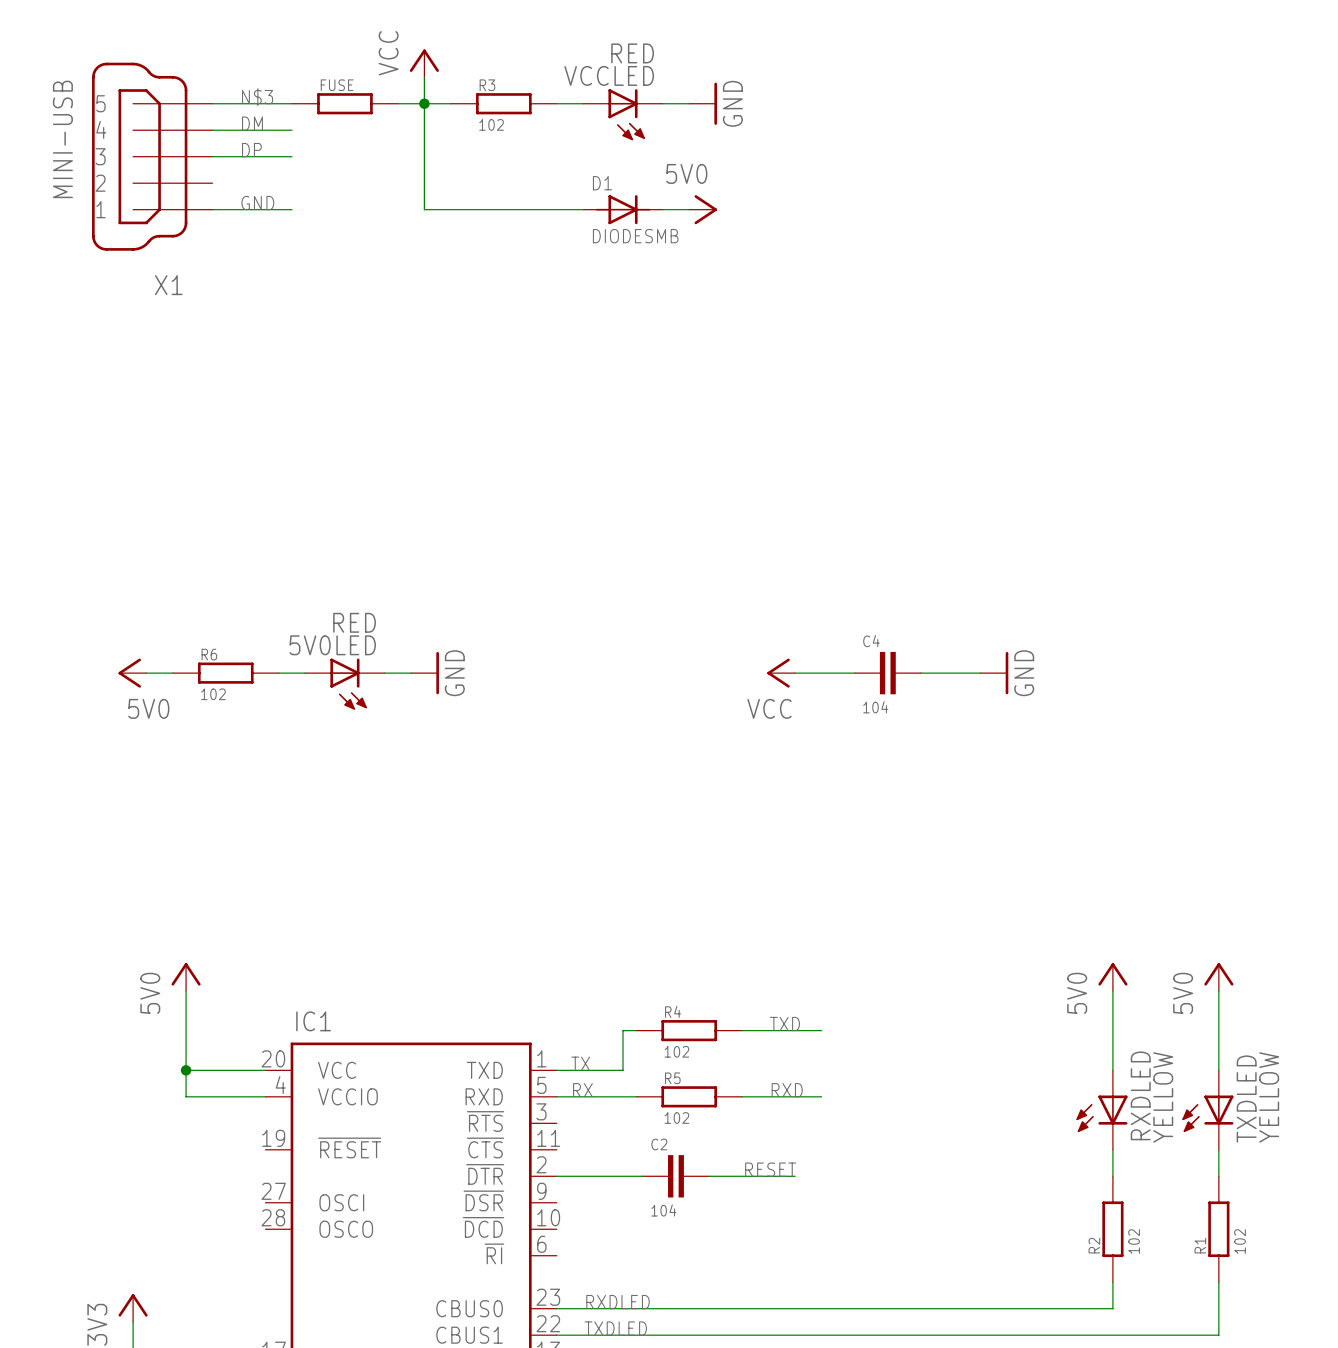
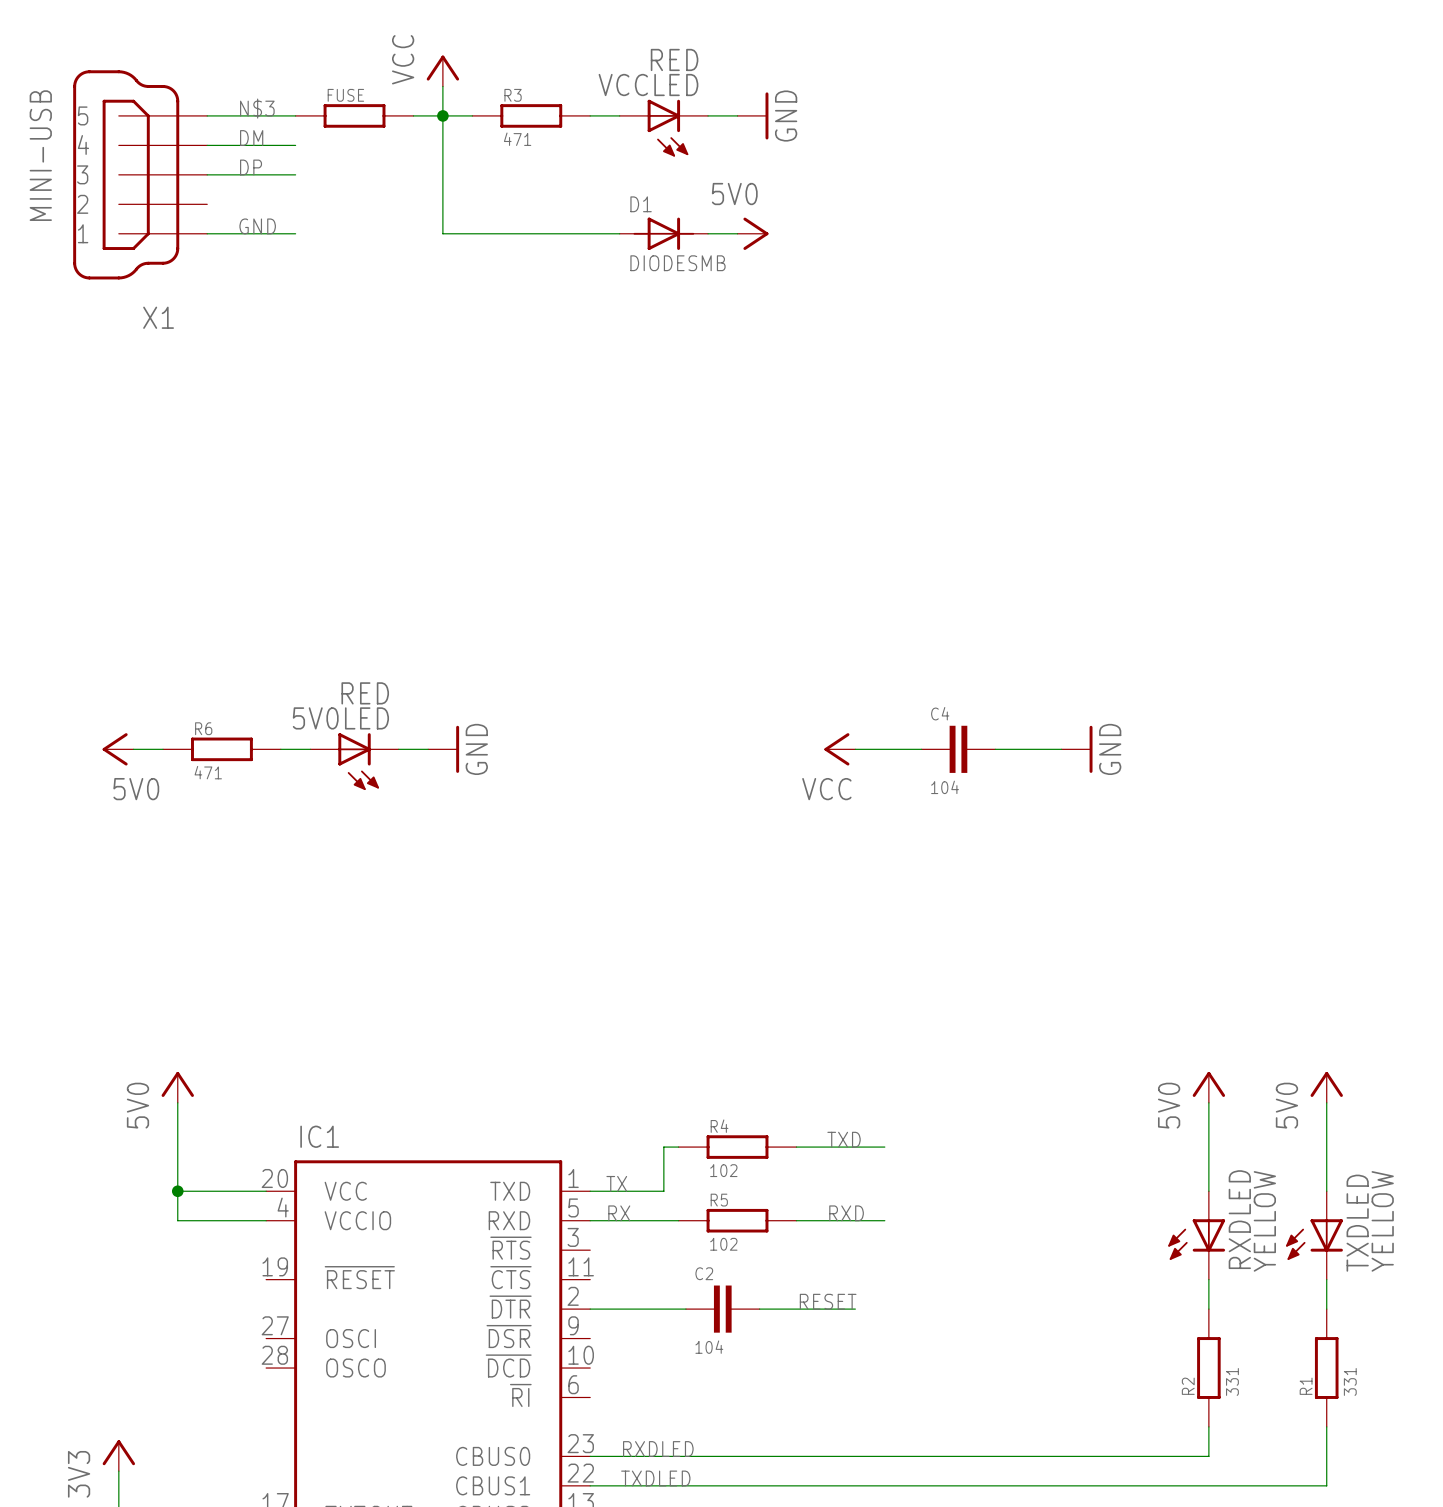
R3 value: 102 (491, 124) -> 471 (517, 139)
R6 value: 102 (213, 694) -> 471 (208, 772)
R2 value: 102 (1134, 1241) -> 331 (1232, 1381)
R1 value: 102 (1240, 1241) -> 331 (1350, 1381)

